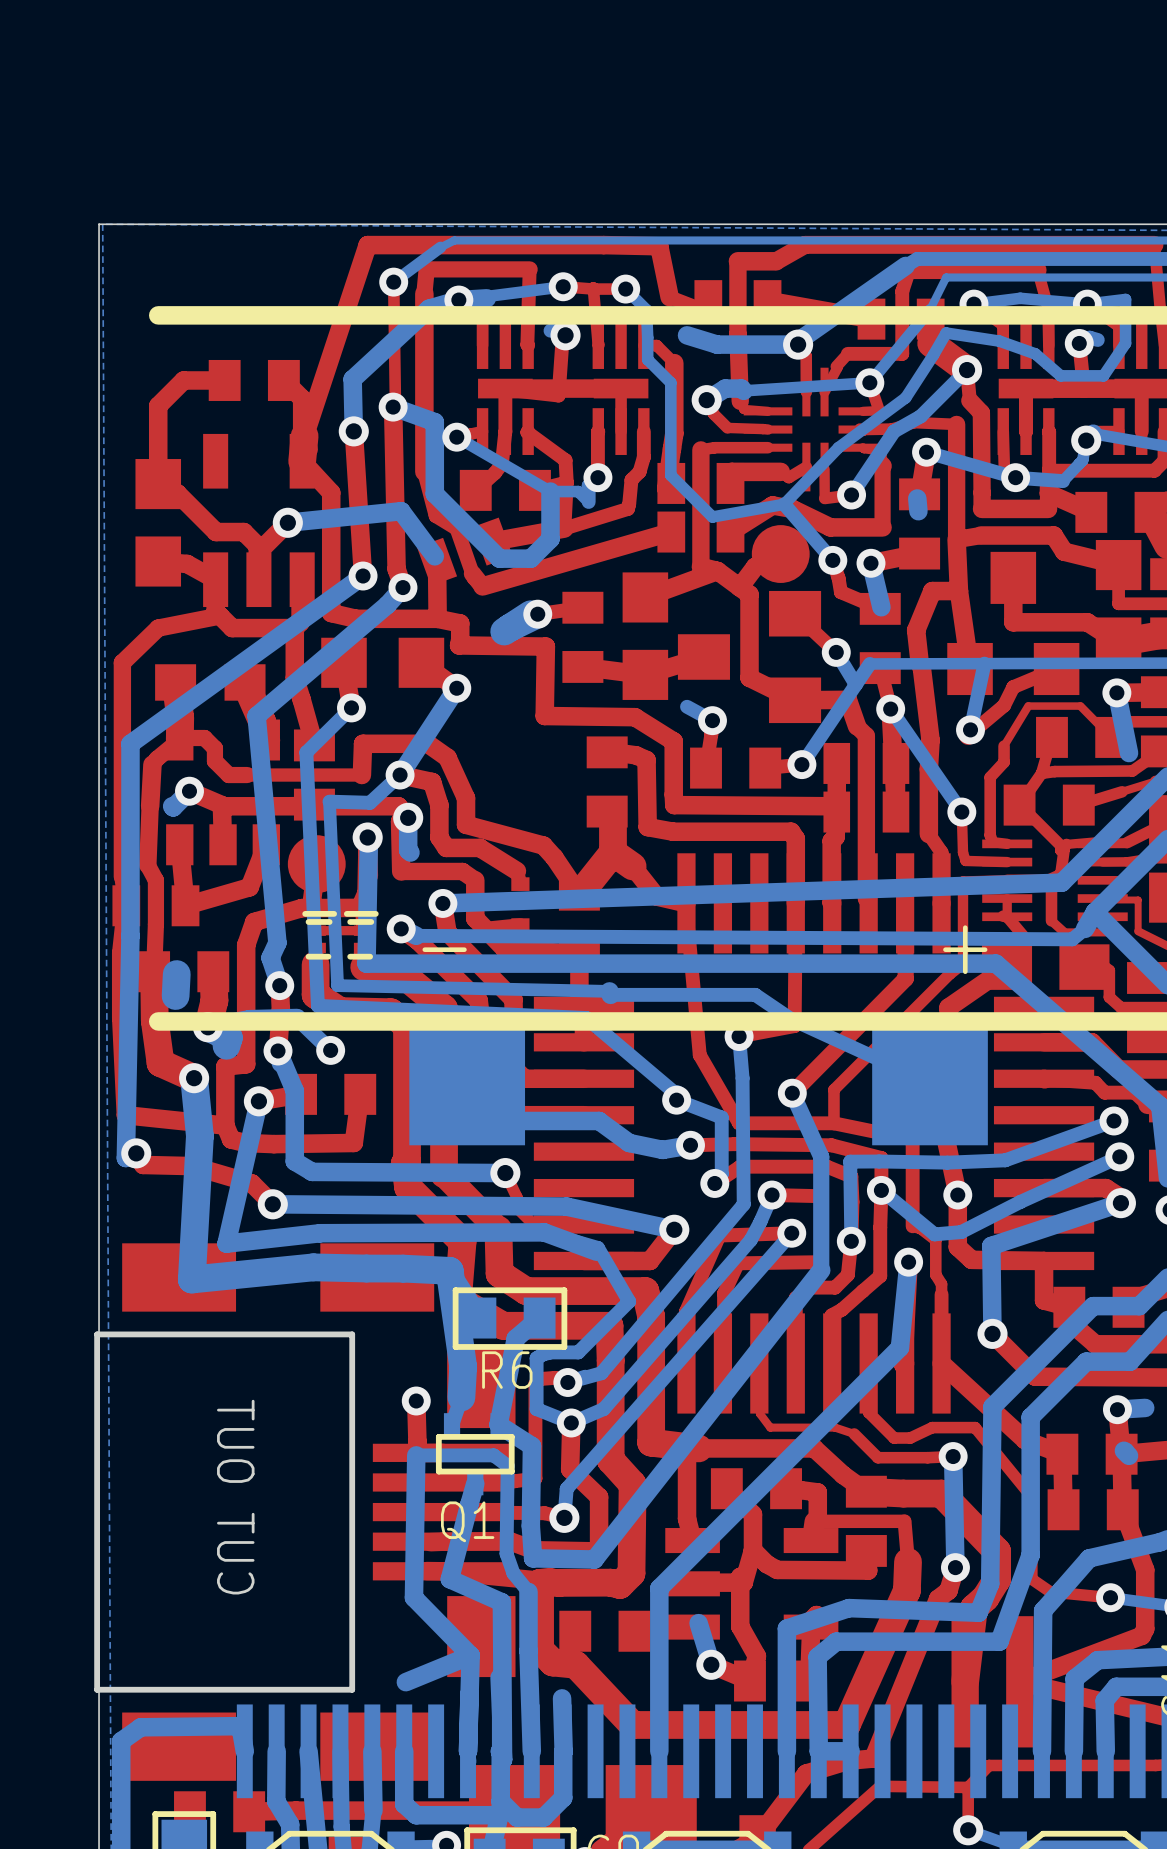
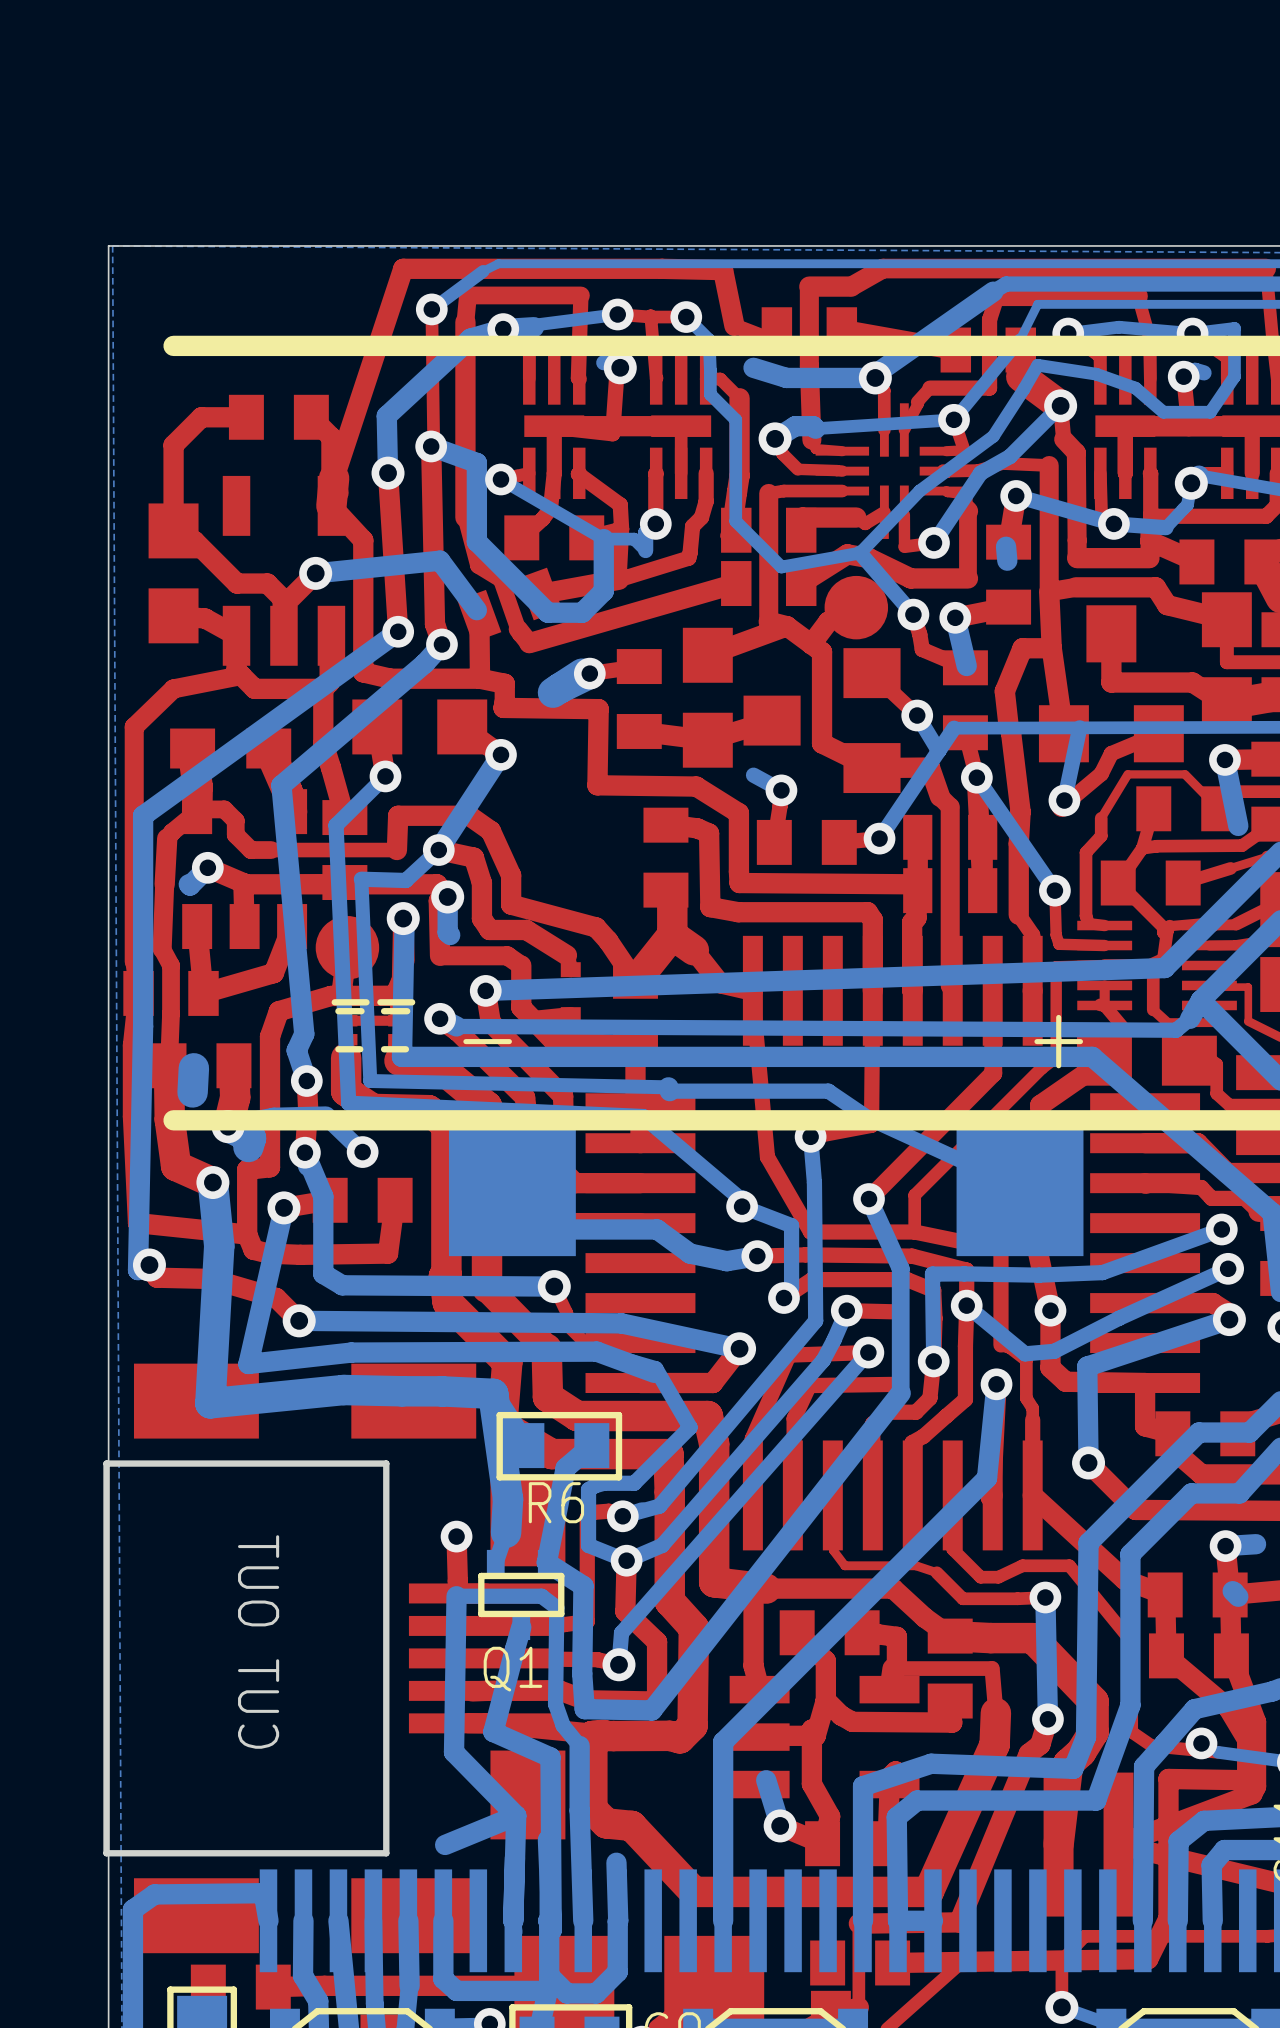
top track: none -> (1166, 1655) (1228, 1707) (1247, 1739) (1247, 1780) (1168, 1778) (1168, 1918) (1148, 1959) (892, 1962)
via position: (1110, 1597) -> (1201, 1743)
top track: (938, 1598) (873, 1758) (847, 1760) (806, 1773) (757, 1837) -> (1028, 1753) (959, 1922) (858, 1923) (858, 2007) (830, 2015)
part: (604, 1631) -> none
part: none -> (860, 1962)

